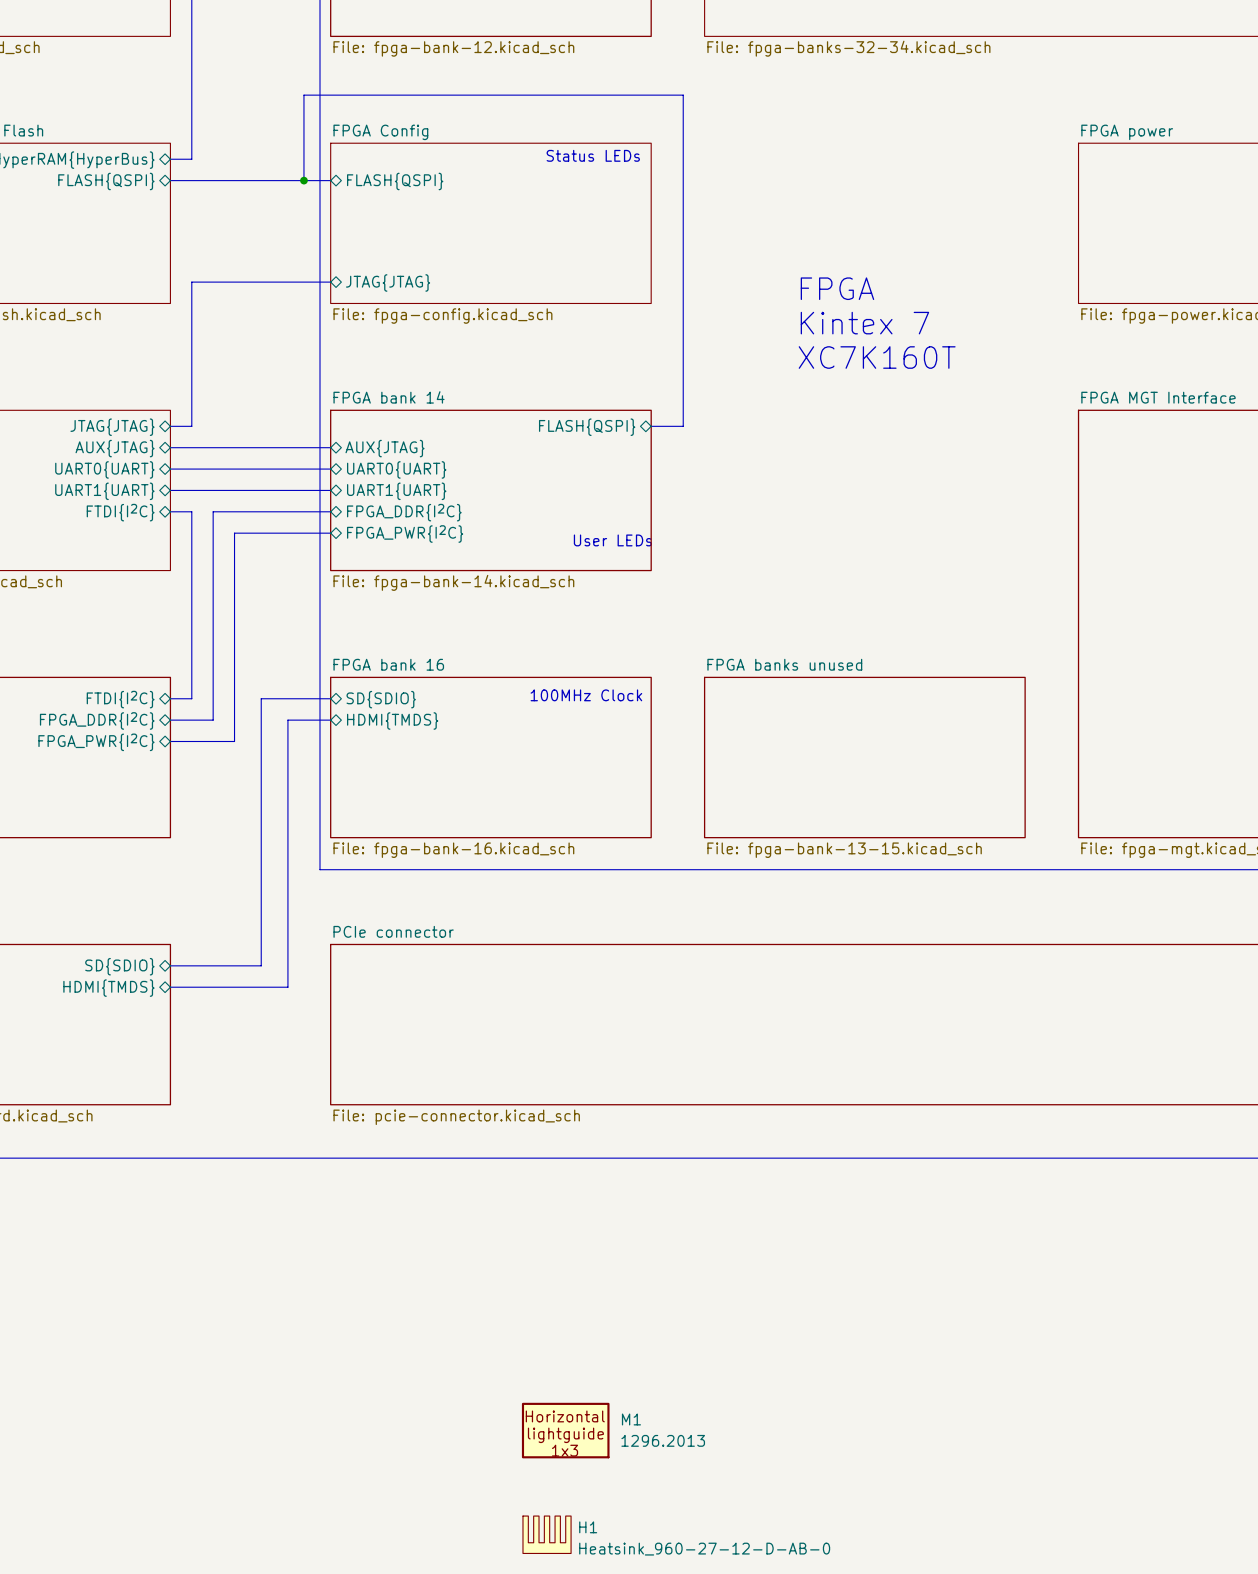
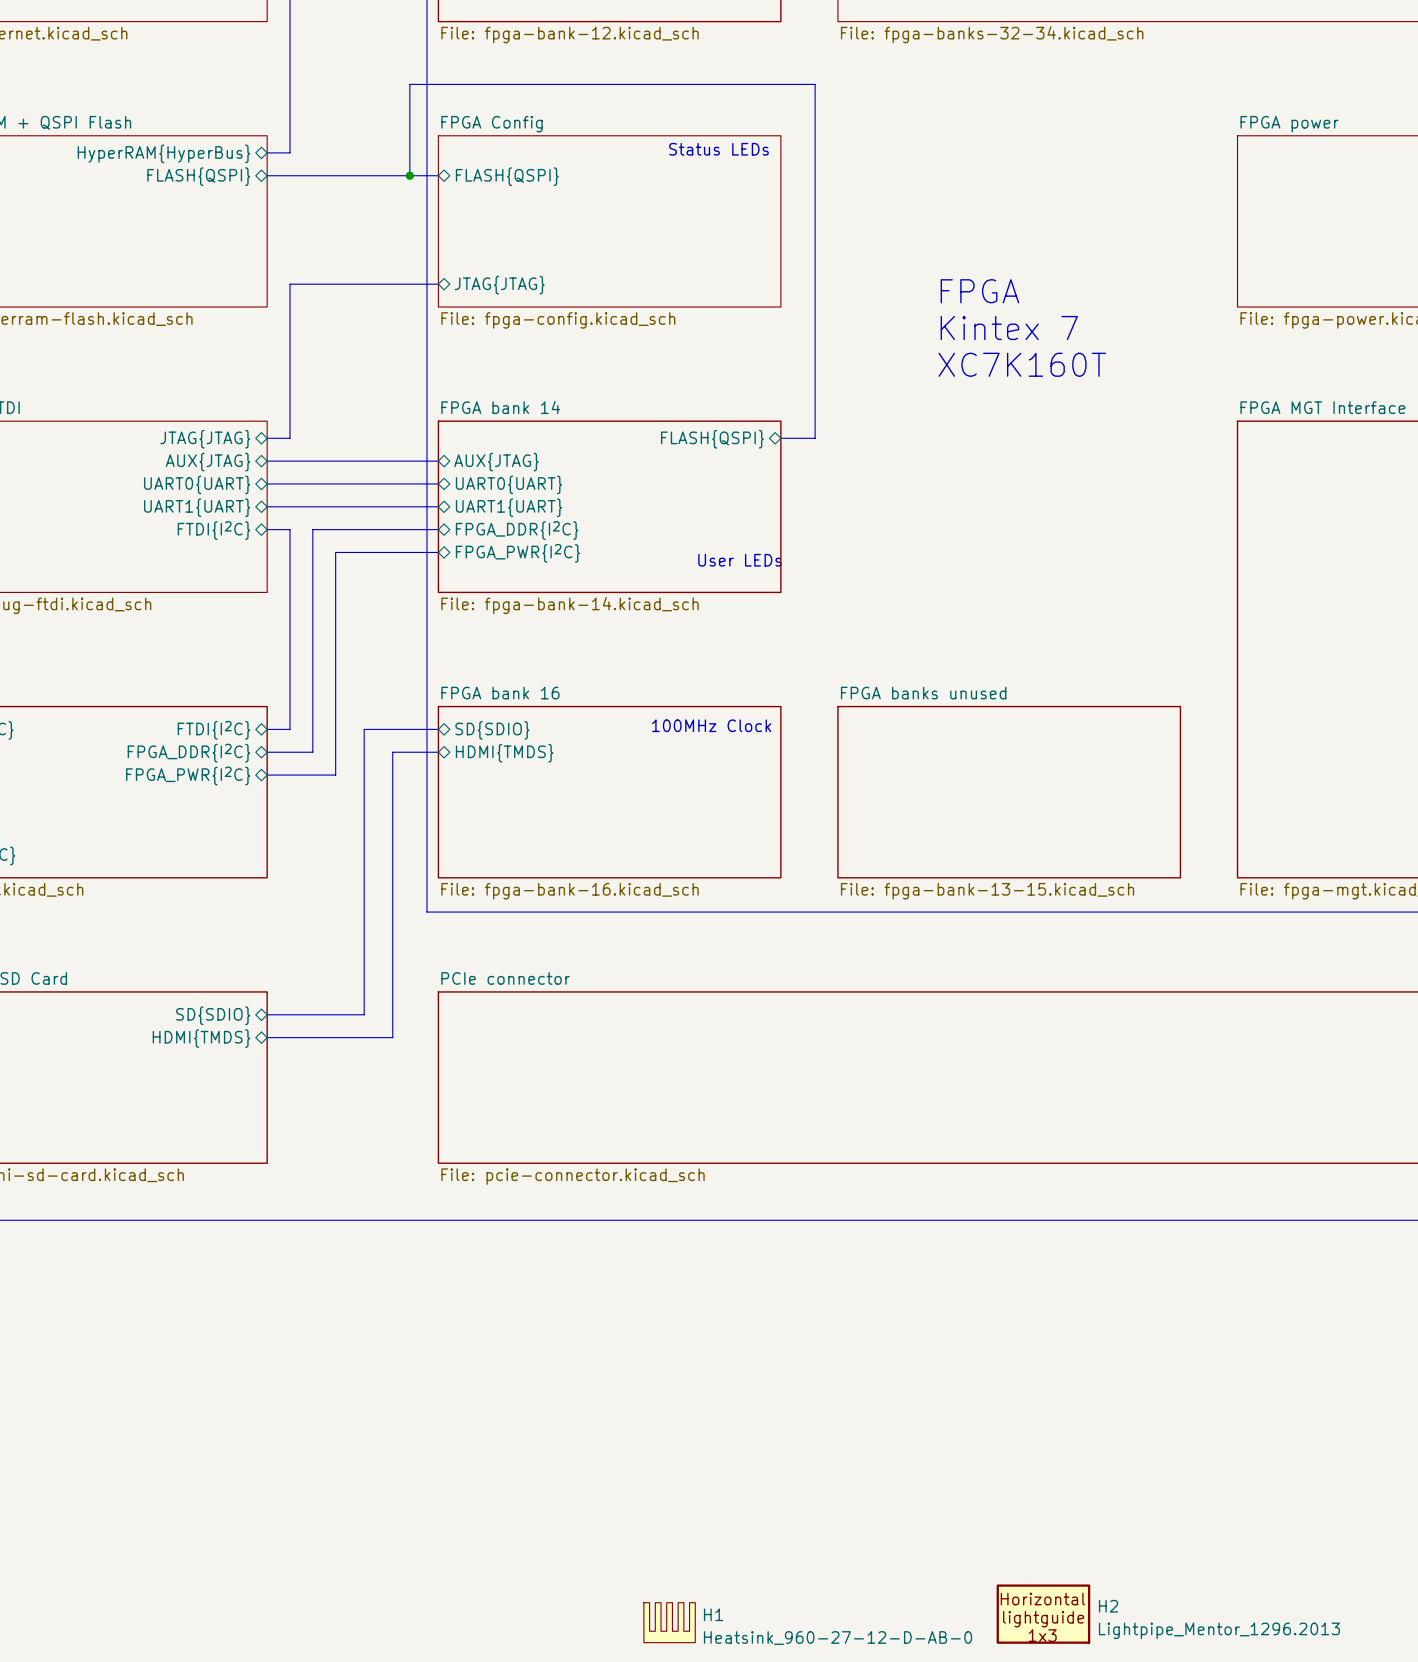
M1: (565, 1430) -> none
H2: none -> Lightpipe_Mentor_1296.2013 (1043, 1614)

